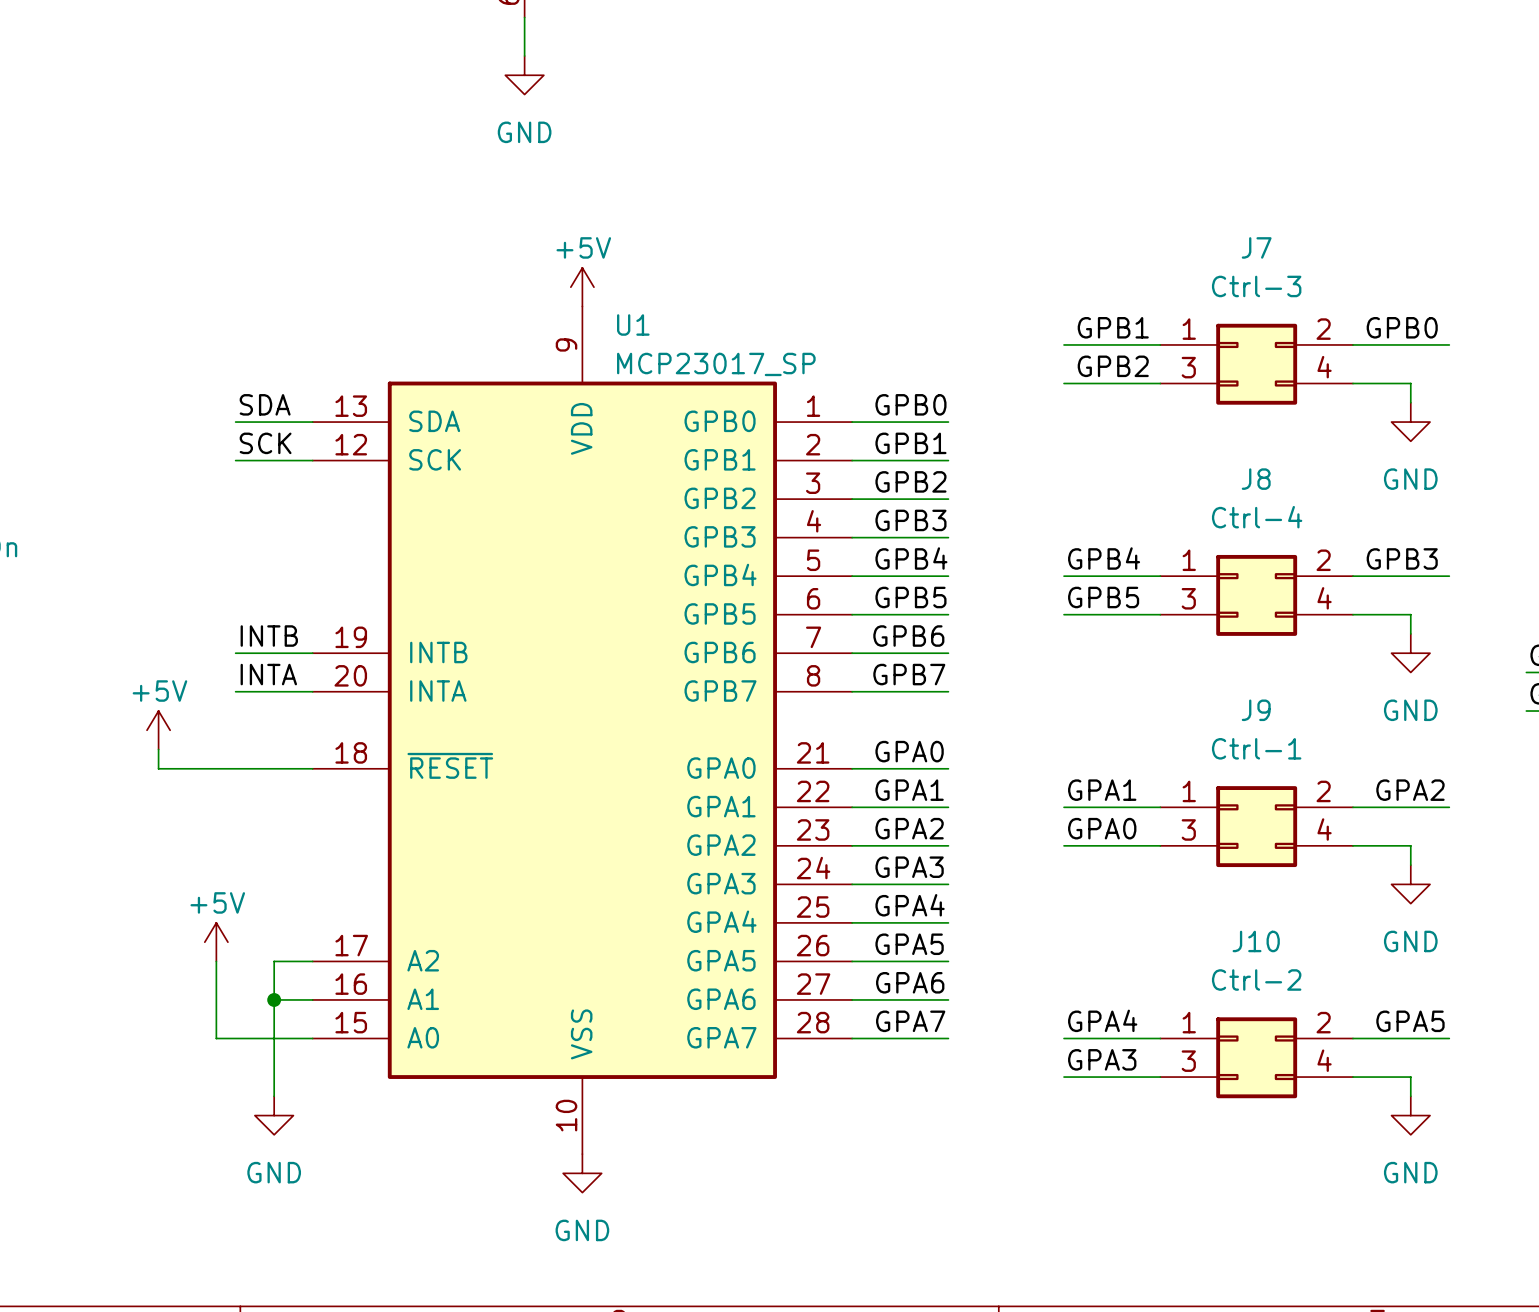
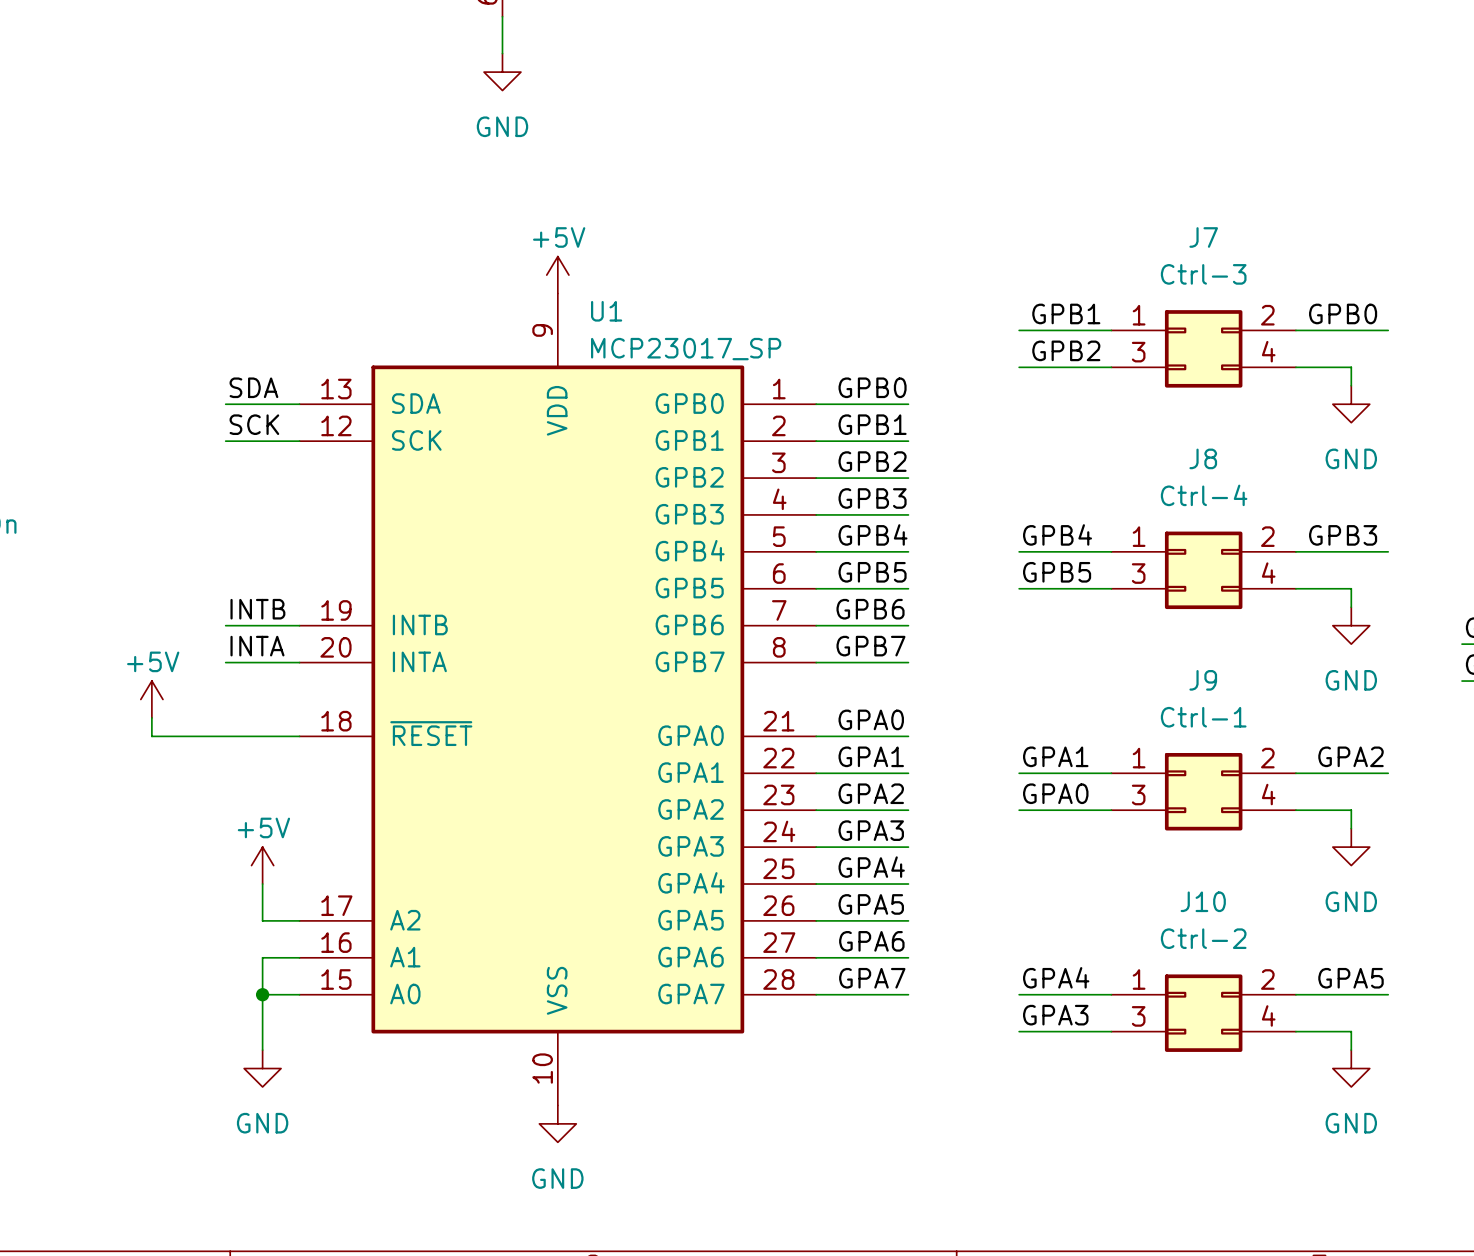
power symbol position: +5V (216, 942) -> +5V (262, 865)
wire: (216, 961) (216, 1038) (274, 1038) -> none
wire: (274, 961) (274, 999) -> (262, 920) (262, 884)
junction position: (274, 999) -> (262, 994)

